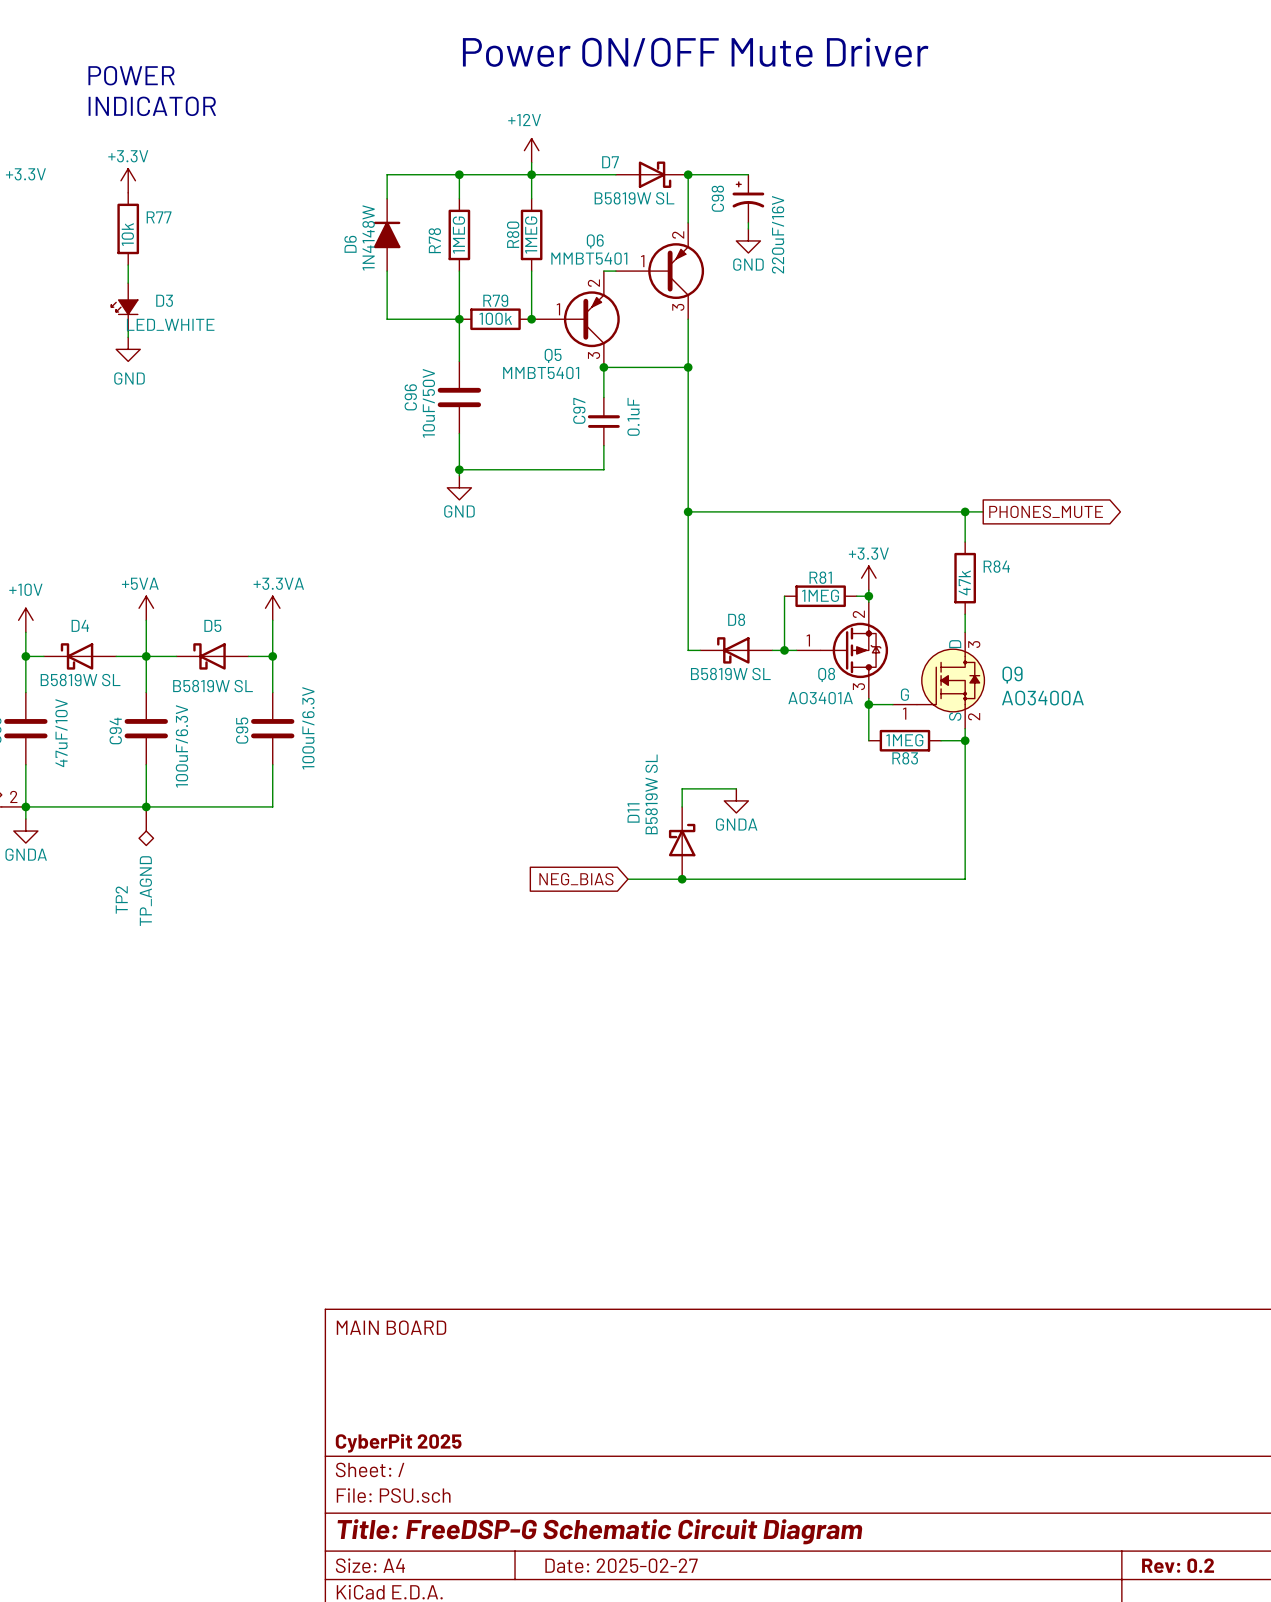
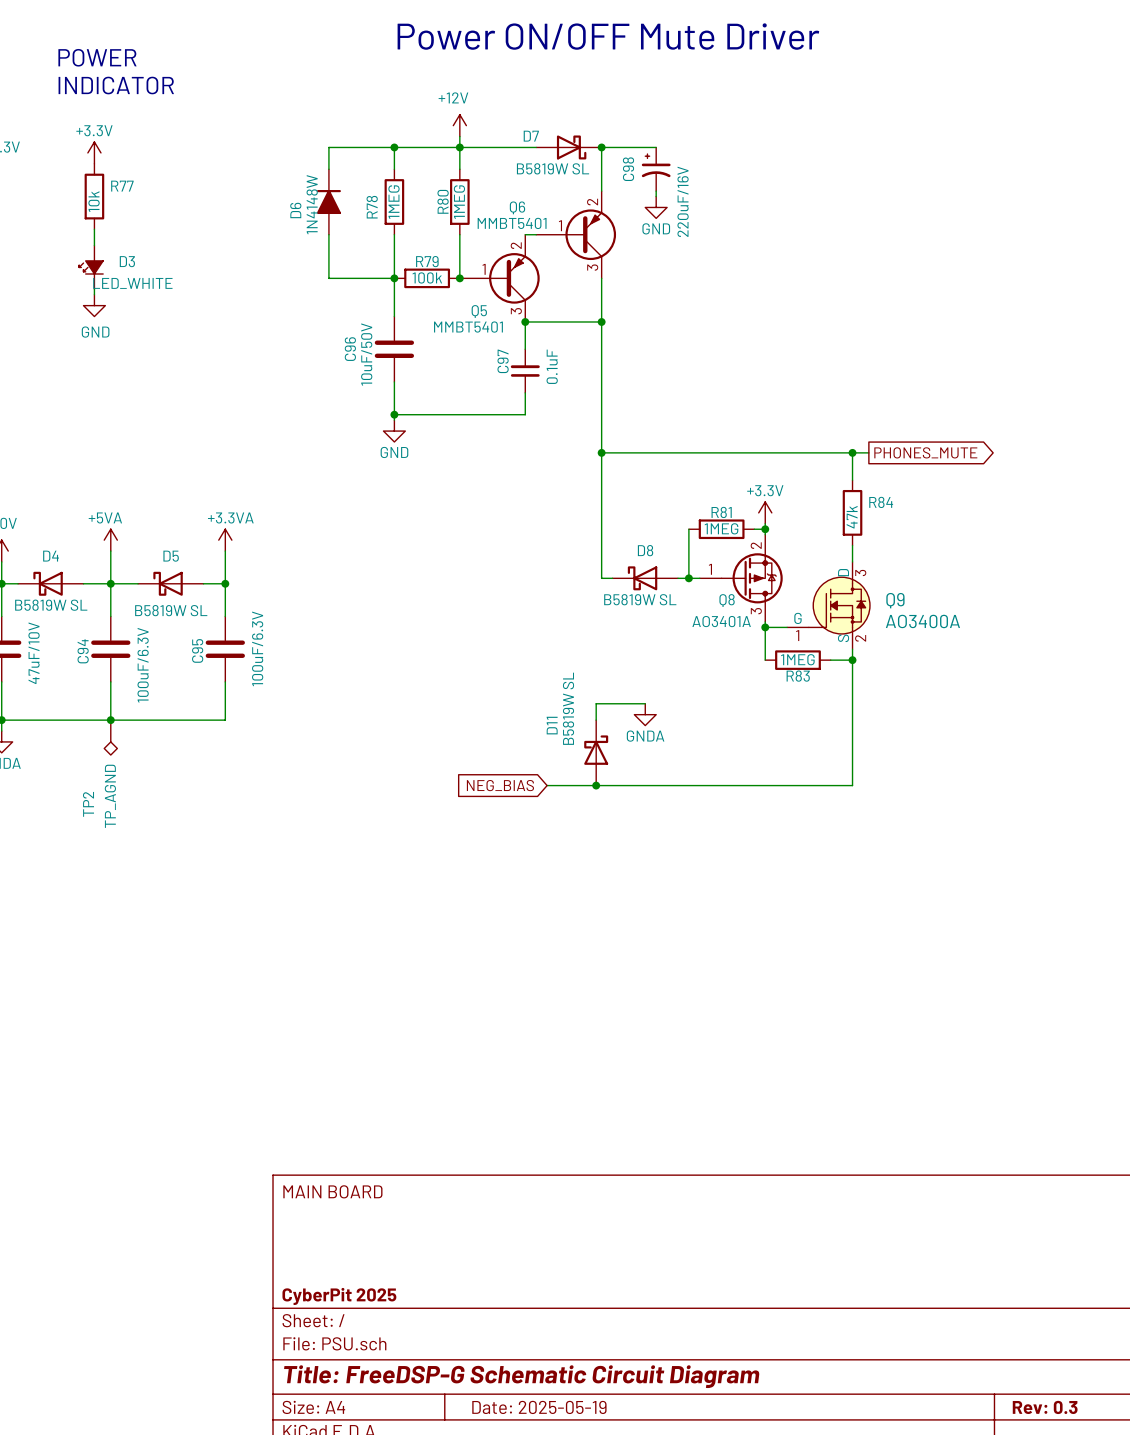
title block: Date: 2025-02-27 (621, 1565) -> Date: 2025-05-19 (539, 1407)
title block: Rev: 0.2 (1178, 1565) -> Rev: 0.3 (1045, 1407)

